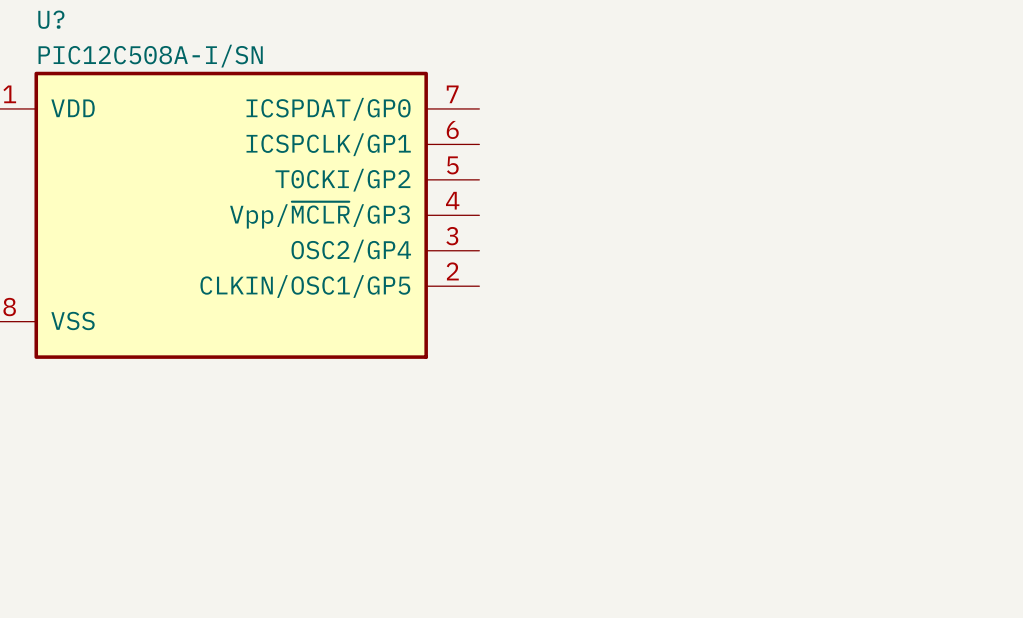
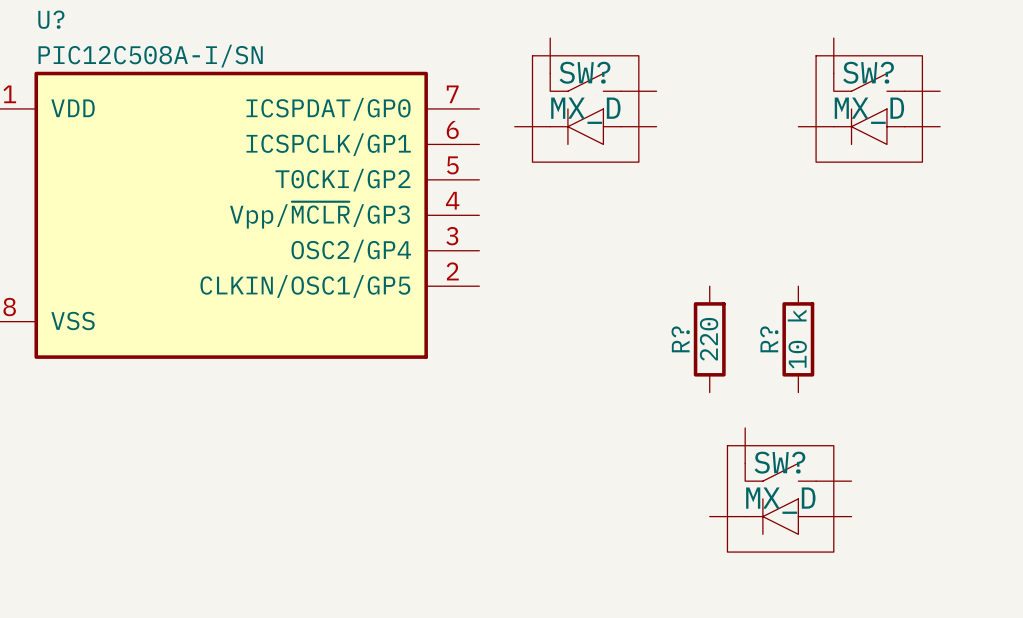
SW?: none -> MX_D (585, 100)
SW?: none -> MX_D (869, 100)
R?: none -> 220 (709, 339)
R?: none -> 10 k (798, 339)
SW?: none -> MX_D (780, 490)

